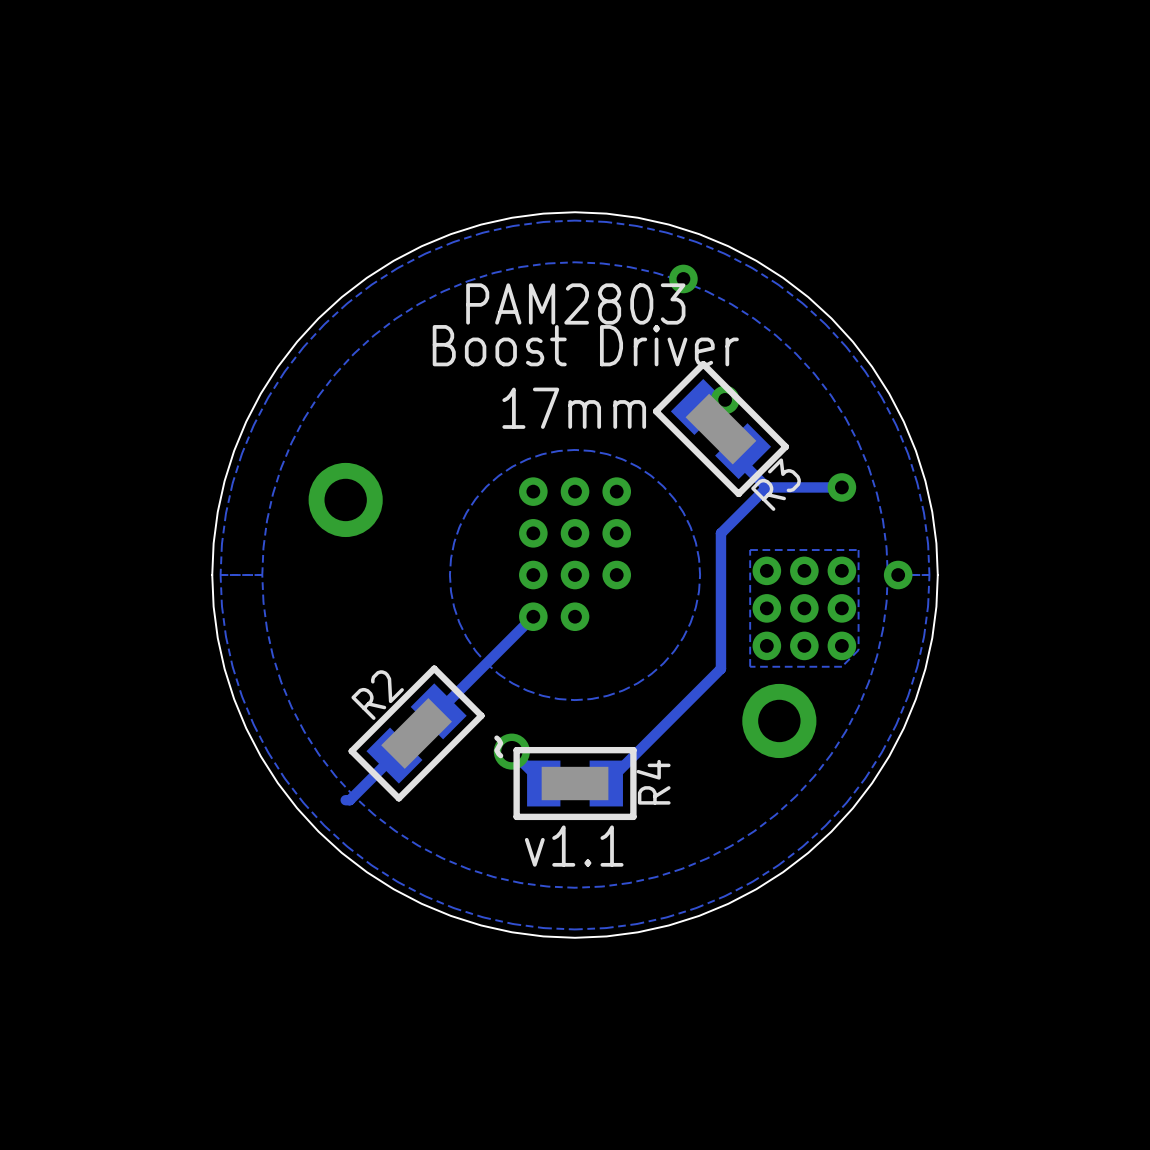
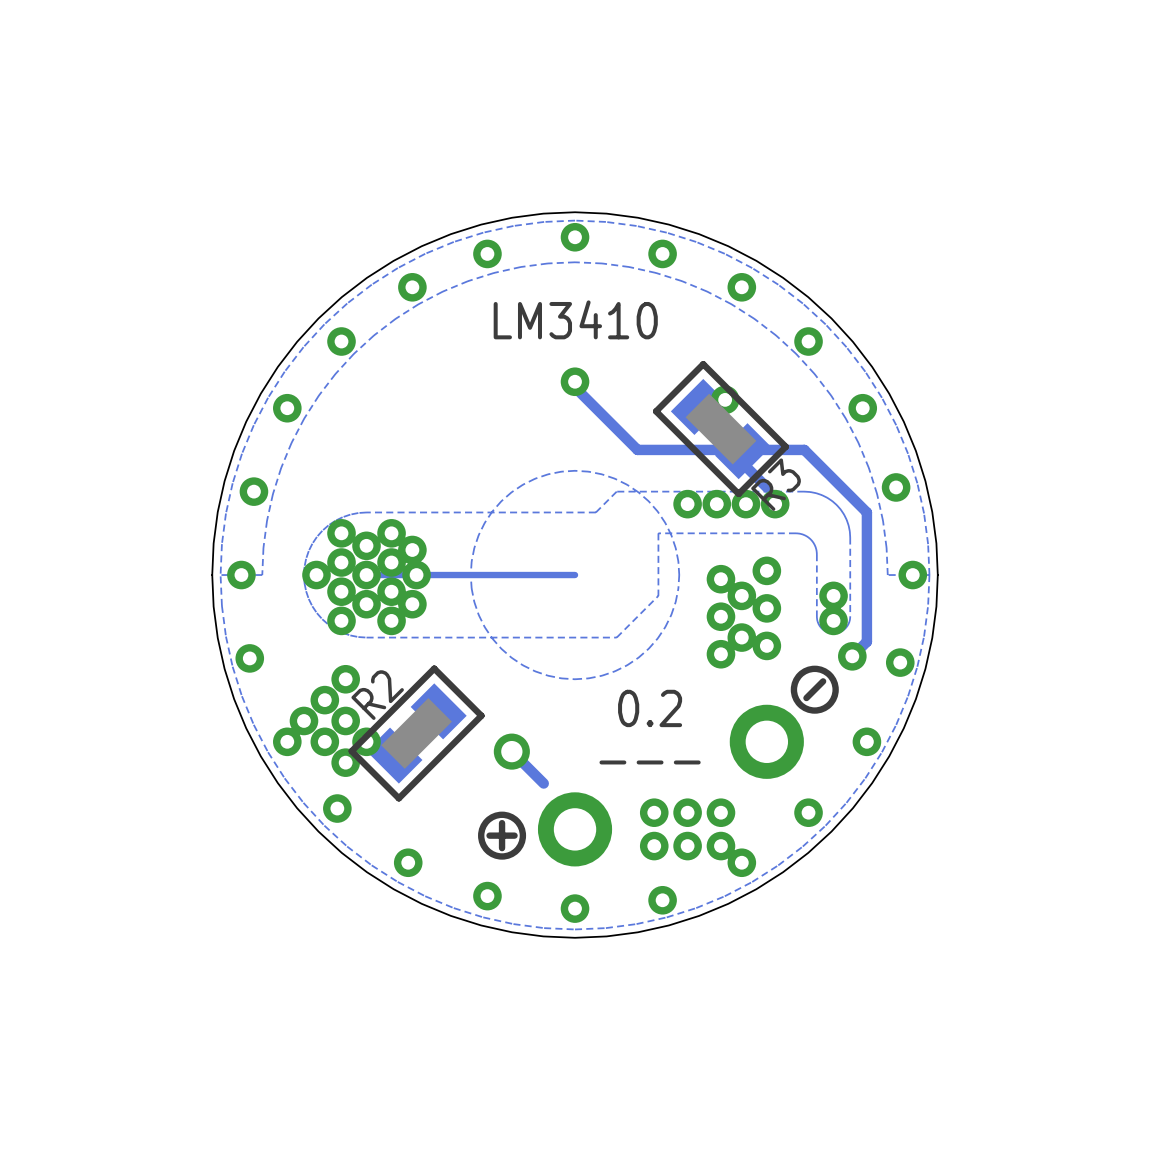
via: none -> (575, 237)
via: none -> (487, 253)
via position: (683, 278) -> (662, 253)
via: none -> (412, 287)
via: none -> (741, 287)
text: PAM2803 (575, 303) -> none
text: none -> LM3410 (575, 319)
via: none -> (341, 341)
via: none -> (808, 341)
text: Boost Driver (585, 345) -> none
track: none -> (575, 381) (575, 387) (637, 449) (804, 449) (866, 512) (866, 641) (852, 656)
via: none -> (575, 381)
via: none -> (287, 408)
text: 17mm (574, 408) -> none
via: none -> (862, 408)
zone outline: (575, 449) (607, 454) (622, 459) (651, 475) (663, 486) (674, 498) (690, 527) (695, 542) (700, 575) (695, 607) (690, 622) (674, 651) (663, 663) (651, 674) (622, 690) (607, 695) (575, 700) (542, 695) (527, 690) (498, 674) (486, 663) (475, 651) (459, 622) (454, 607) (449, 575) (454, 542) (459, 527) (475, 498) (486, 486) (498, 475) (527, 459) (542, 454) (575, 449) -> (575, 470) (588, 471) (614, 478) (638, 492) (648, 501) (665, 522) (671, 535) (678, 561) (679, 575) (675, 602) (671, 614) (665, 627) (648, 648) (627, 665) (614, 671) (602, 675) (575, 679) (561, 678) (535, 671) (522, 665) (501, 648) (484, 627) (478, 614) (471, 588) (470, 575) (474, 548) (478, 535) (492, 511) (501, 501) (522, 484) (535, 478) (561, 471) (575, 470)
track: (841, 487) (766, 487) (720, 533) (720, 668) (606, 783) -> none
via: (841, 487) -> none
via: none -> (896, 487)
via: none -> (253, 491)
via: (533, 491) -> none
via: (575, 491) -> none
via: (616, 491) -> none
zone outline: none -> (804, 491) (821, 495) (832, 501) (840, 509) (848, 525) (850, 618) (846, 626) (837, 632) (827, 632) (818, 623) (816, 548) (808, 537) (798, 533) (658, 533) (658, 595) (616, 637) (358, 637) (342, 632) (322, 619) (312, 606) (304, 583) (306, 558) (316, 536) (335, 520) (358, 513) (595, 512) (616, 491) (804, 491)
part position: (345, 499) -> (575, 829)
via: none -> (687, 504)
via: none -> (716, 504)
via: none -> (745, 504)
via: none -> (775, 504)
via: none -> (341, 533)
via: none -> (391, 533)
via: (533, 533) -> none
via: (575, 533) -> none
via: (616, 533) -> none
via: none -> (366, 545)
via: none -> (412, 550)
zone outline: (858, 550) (858, 650) (841, 666) (750, 666) (750, 550) (858, 550) -> none
via: none -> (341, 562)
via: none -> (391, 562)
via: (804, 570) -> none
via: (841, 570) -> none
via: none -> (241, 575)
via: none -> (316, 575)
via: none -> (416, 575)
via: (533, 575) -> none
track: none -> (575, 575) (366, 575)
via: (575, 575) -> none
part position: (616, 575) -> (366, 575)
zone outline: (887, 575) (883, 629) (868, 681) (845, 731) (831, 754) (796, 796) (754, 831) (707, 858) (655, 877) (602, 886) (575, 887) (547, 886) (494, 877) (442, 858) (395, 831) (353, 796) (318, 754) (291, 707) (272, 655) (263, 602) (262, 575) -> none
part position: (898, 575) -> (912, 575)
via: none -> (720, 579)
via: none -> (341, 591)
via: none -> (391, 591)
via: none -> (741, 595)
via: none -> (833, 595)
via: none -> (366, 604)
via: none -> (412, 604)
via: (804, 608) -> none
via: (841, 608) -> none
track: (533, 616) (438, 711) -> none
via: (533, 616) -> none
via: (575, 616) -> none
via: none -> (720, 616)
via: none -> (341, 620)
via: none -> (391, 620)
via: none -> (833, 620)
via: none -> (741, 637)
via: (804, 645) -> none
via: (841, 645) -> none
via: none -> (720, 654)
via: none -> (852, 656)
via: none -> (249, 658)
via: none -> (900, 662)
drawing: none -> [790, 665, 839, 714]
via: none -> (345, 679)
line: none -> (823, 681) (806, 698)
via: none -> (324, 700)
text: none -> 0.2 (650, 708)
via: none -> (303, 720)
via: none -> (345, 720)
part position: (779, 720) -> (766, 741)
via: none -> (287, 741)
via: none -> (324, 741)
via: none -> (366, 741)
via: none -> (866, 741)
text: ~ (498, 746) -> none
track: (394, 755) (349, 800) (345, 800) -> none
via: none -> (345, 762)
text: none -> --- (650, 762)
R4: (575, 783) -> none
via: none -> (337, 808)
drawing: none -> [478, 811, 527, 860]
via: none -> (654, 812)
via: none -> (687, 812)
via: none -> (720, 812)
via: none -> (808, 812)
line: none -> (502, 823) (502, 848)
line: none -> (514, 835) (489, 835)
text: v1.1 (574, 846) -> none
via: none -> (654, 846)
via: none -> (687, 846)
via: none -> (720, 846)
via: none -> (408, 862)
via: none -> (741, 862)
via: none -> (487, 896)
via: none -> (662, 900)
via: none -> (575, 908)

